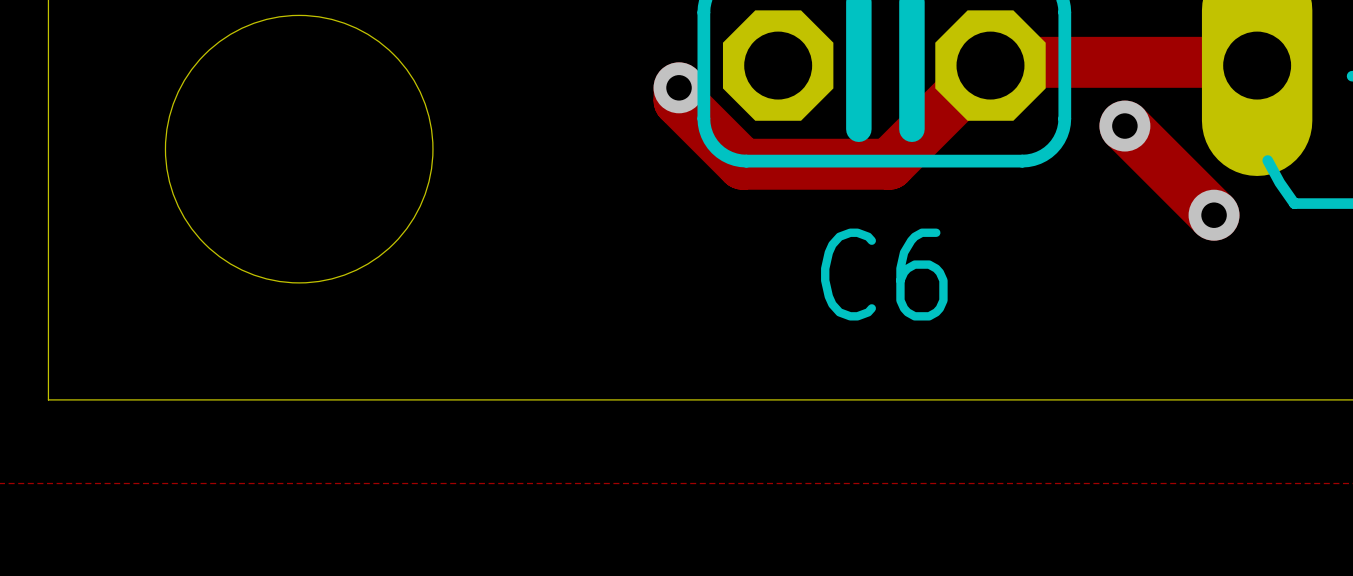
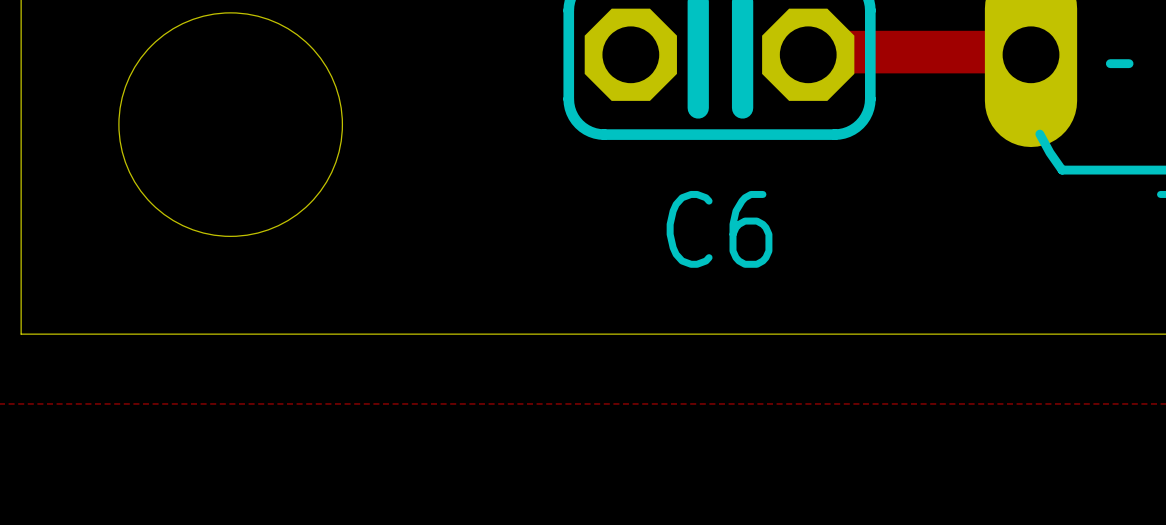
track: (990, 65) (972, 81) (889, 164) (742, 164) (679, 100) (679, 87) -> none
via: (679, 87) -> none
track: (1124, 126) (1214, 215) -> none
via: (1124, 126) -> none
via: (1214, 215) -> none

